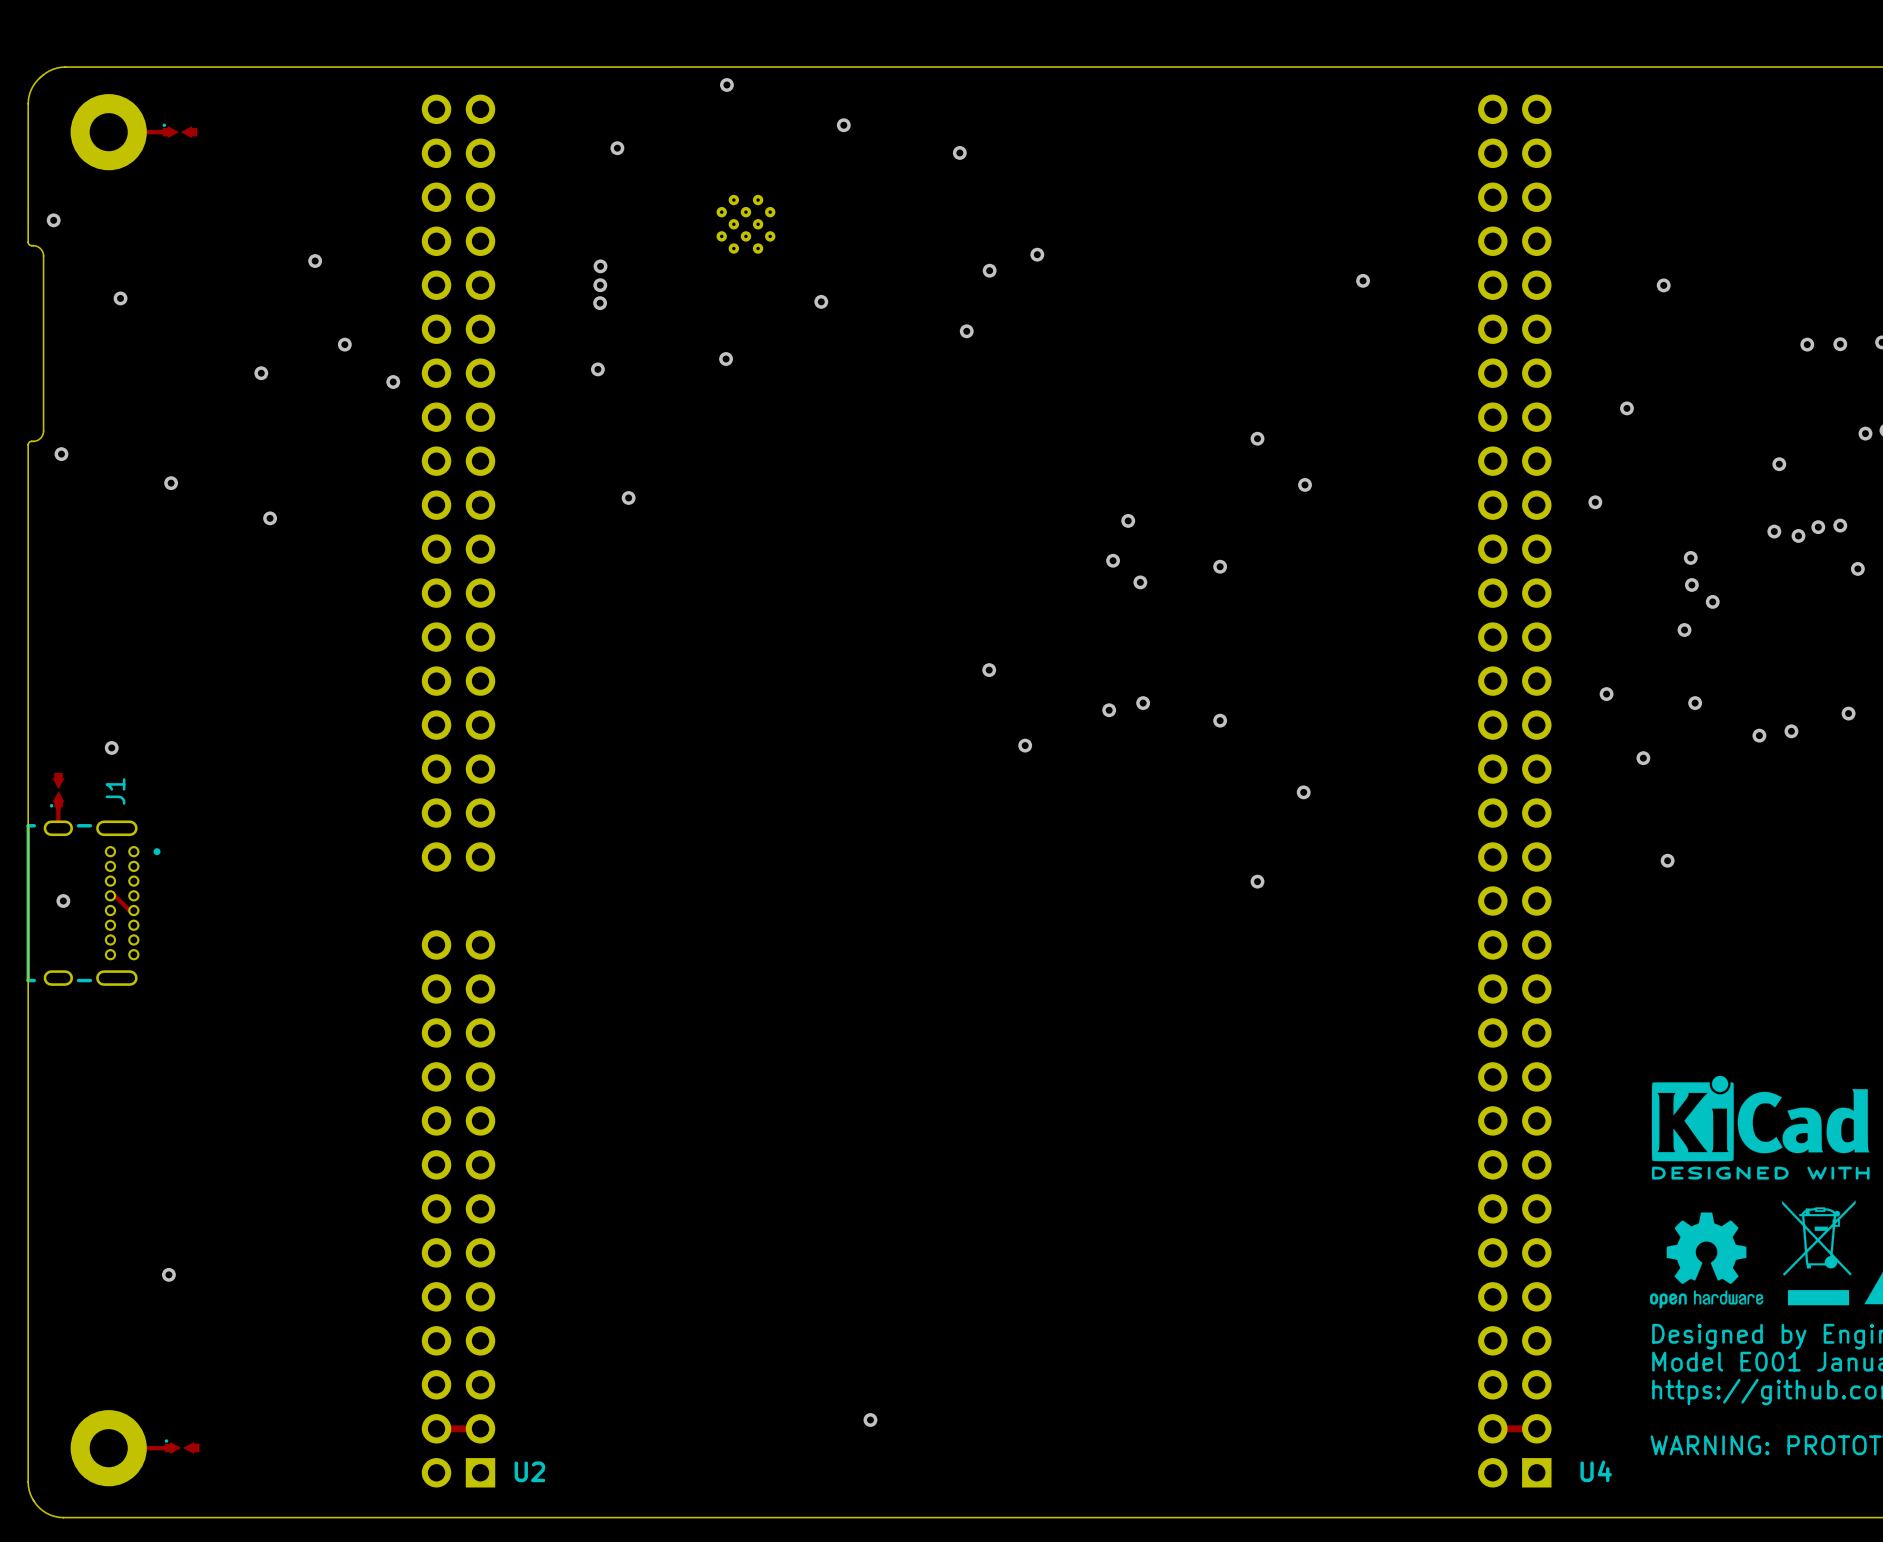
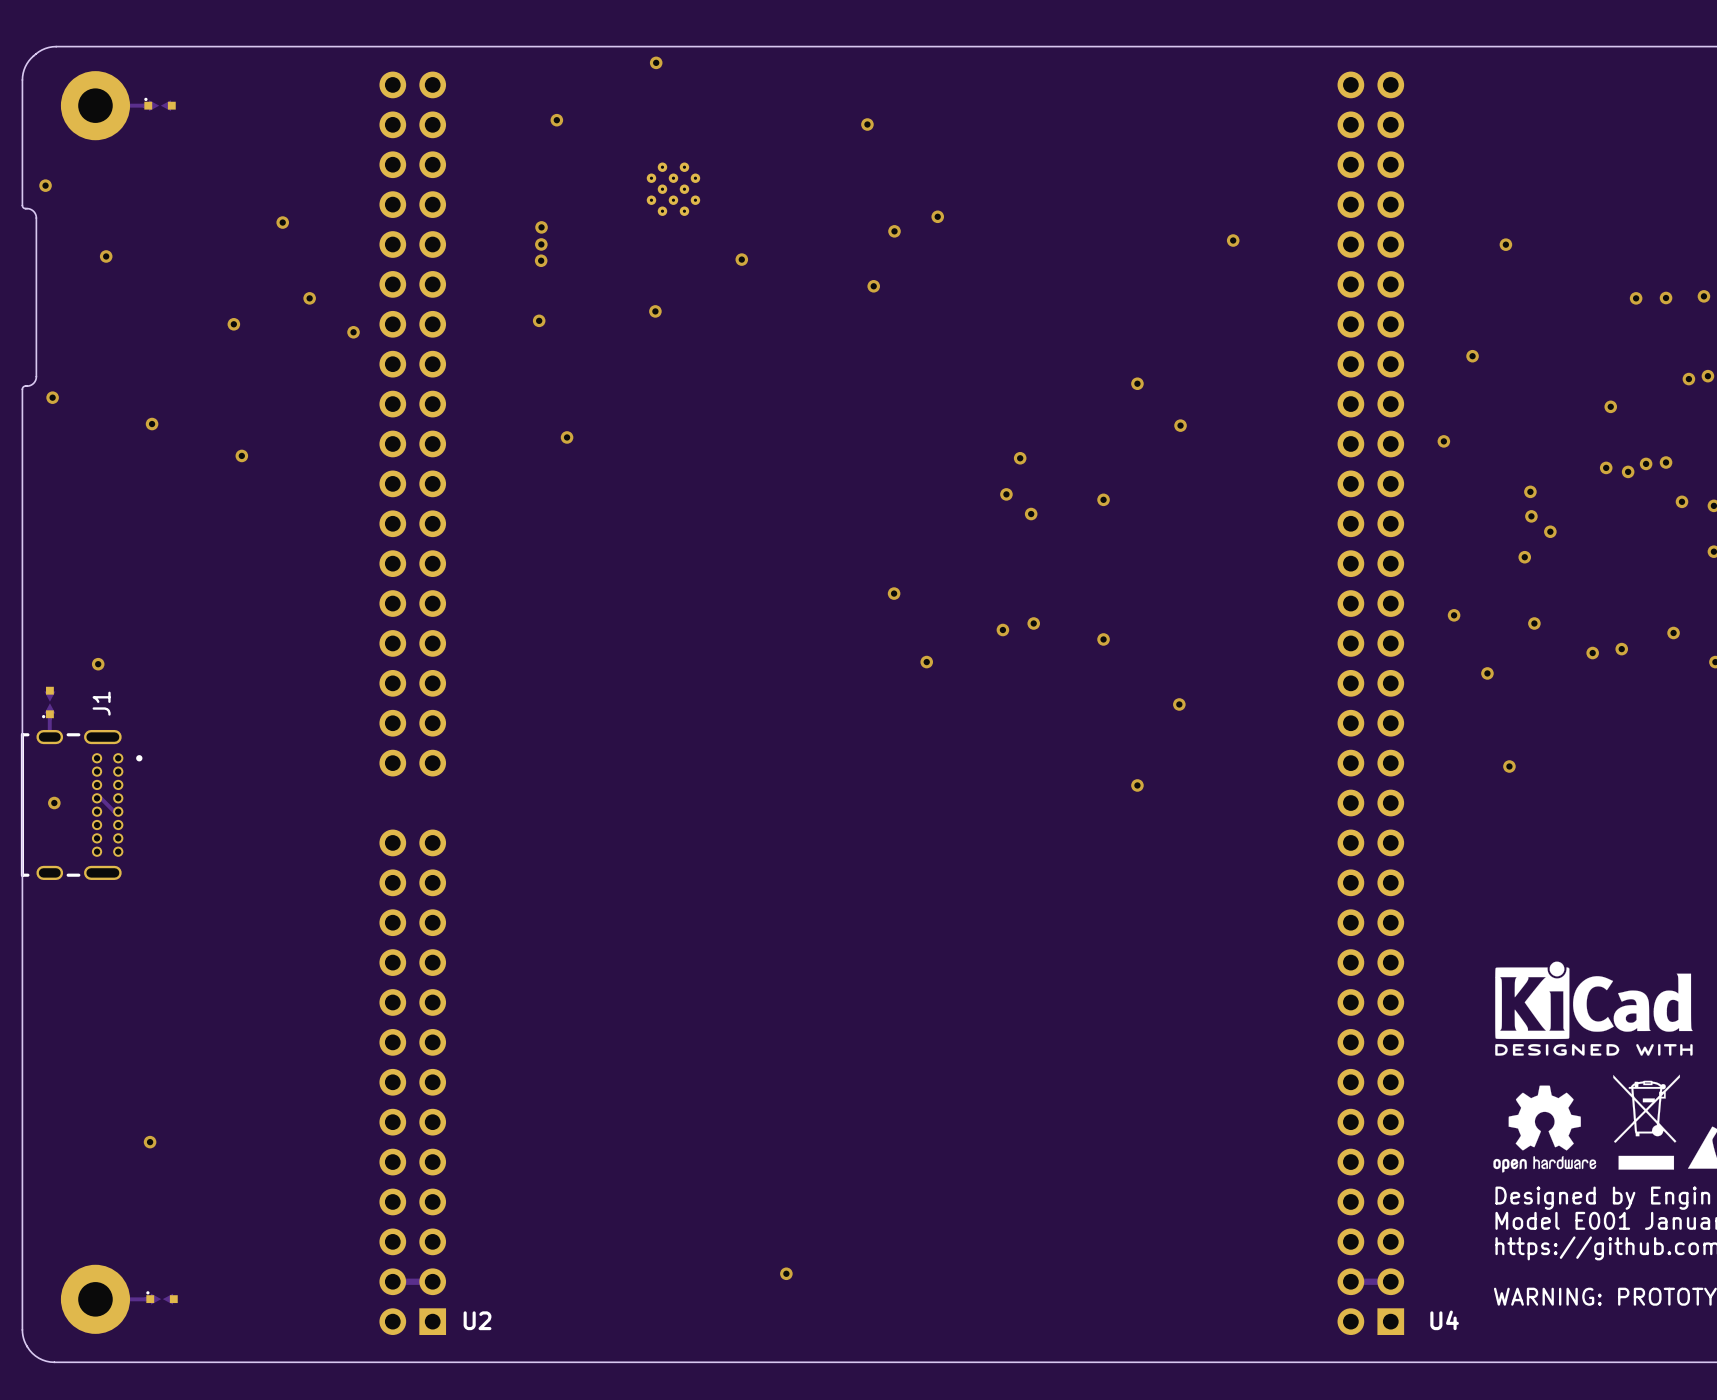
via: (843, 125) -> none

